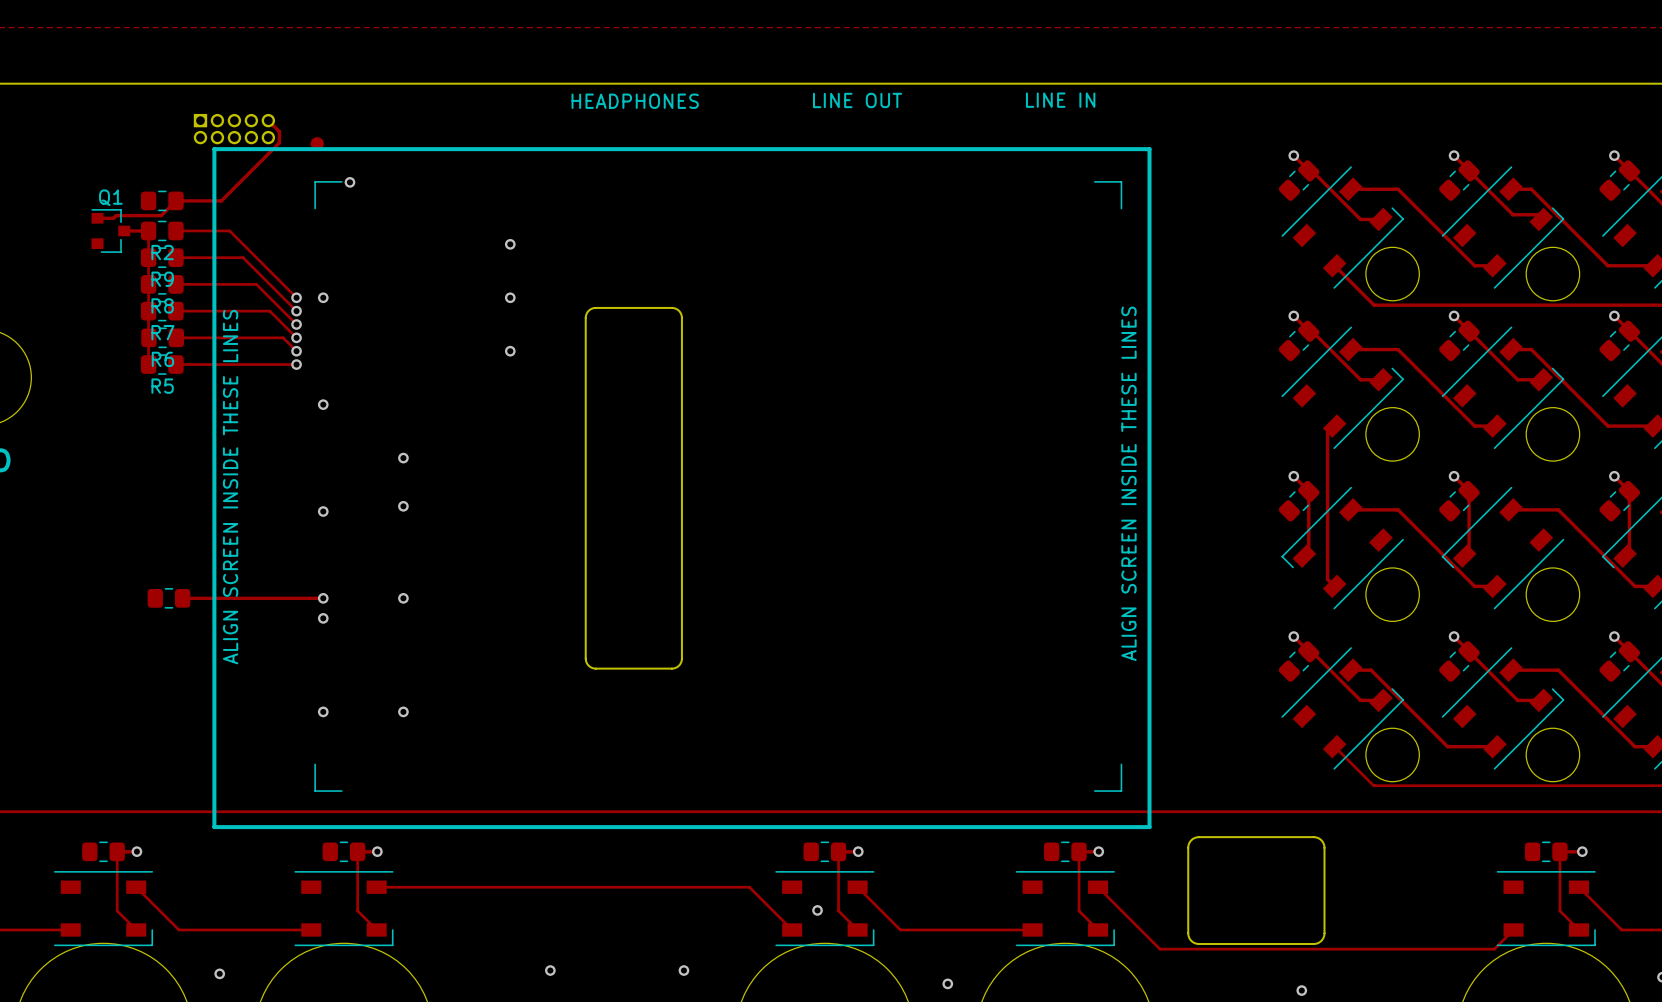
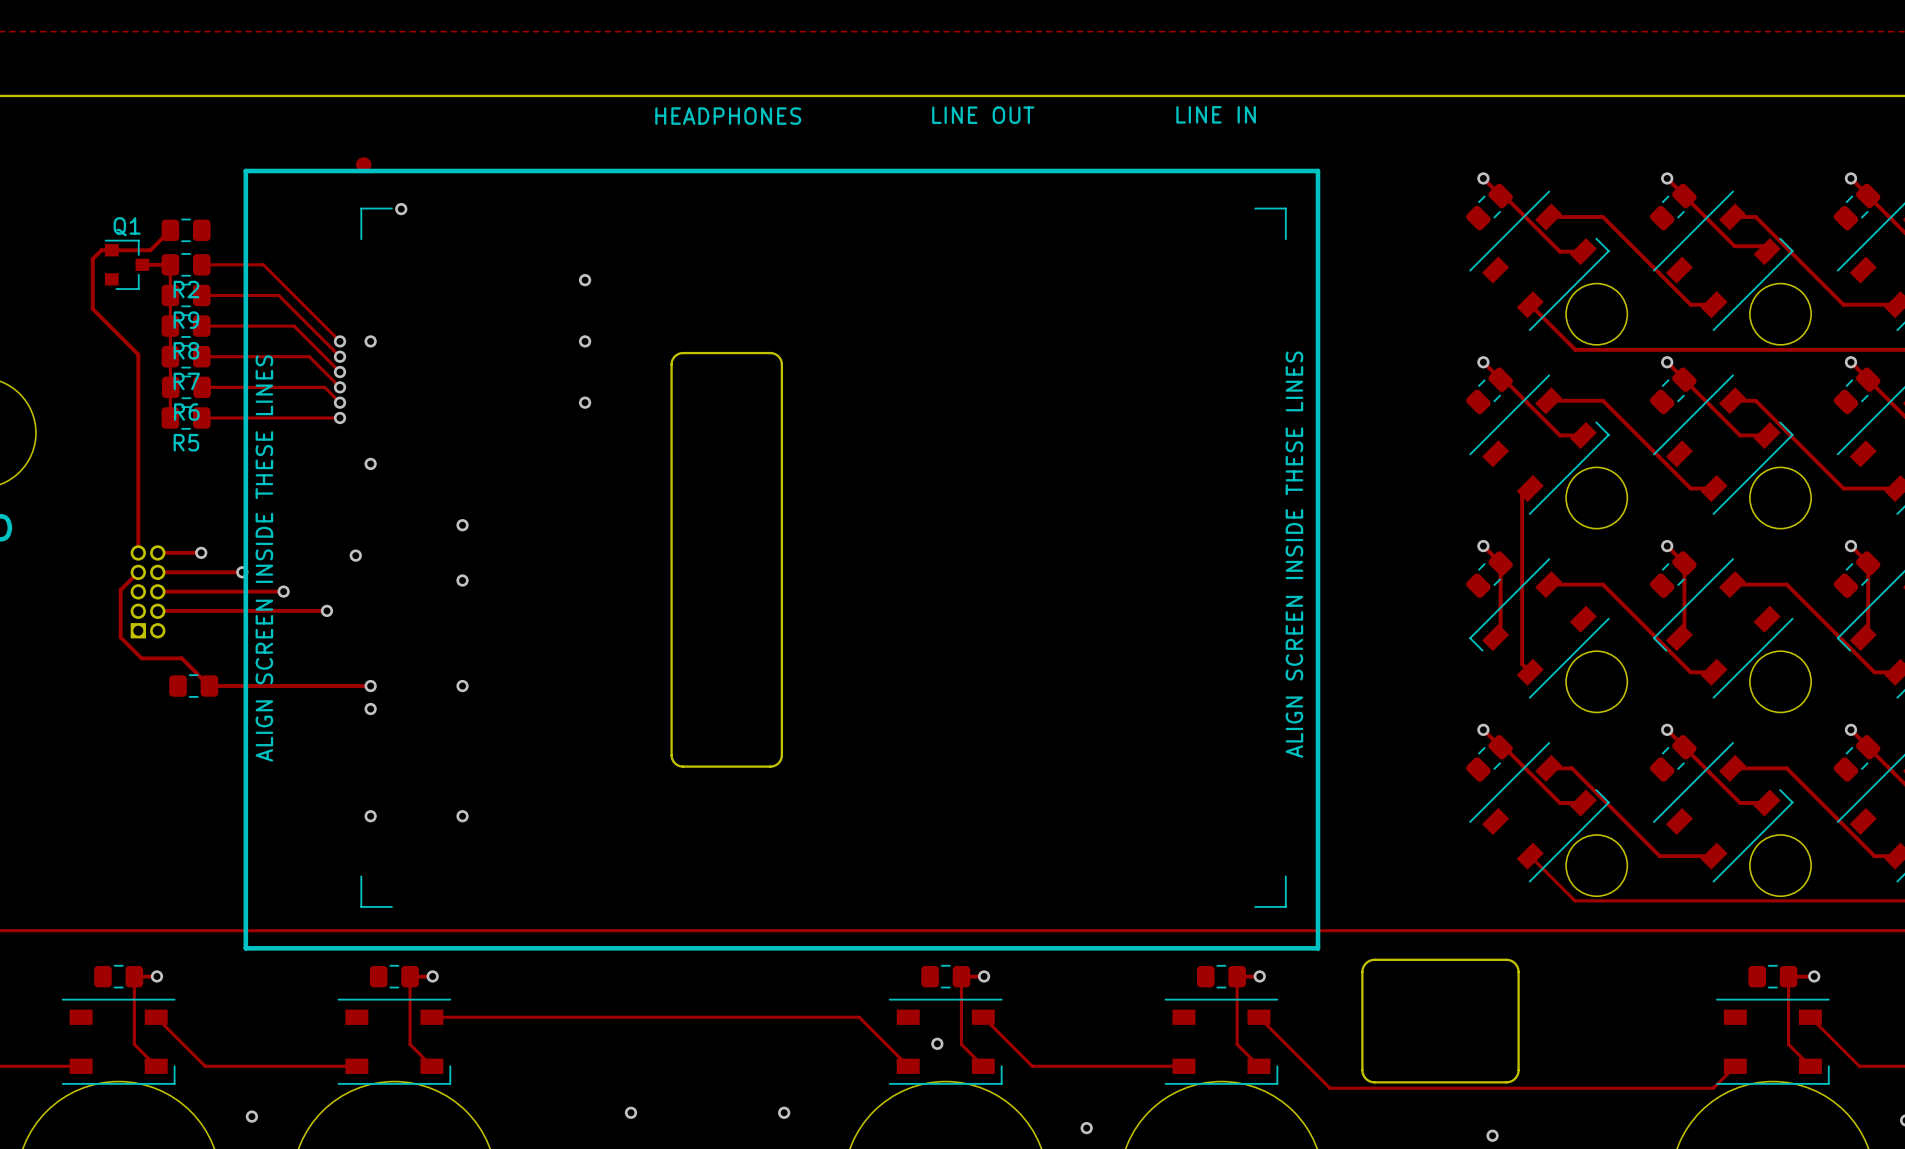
track: (268, 120) (279, 131) (279, 142) (221, 200) (175, 200) (161, 215) (116, 215) (113, 218) -> (170, 230) (150, 250) (130, 250)
part: (234, 129) -> none
track: none -> (111, 250) (101, 250) (92, 258) (92, 309) (138, 354) (138, 552)
track: none -> (157, 552) (201, 552)
via: none -> (201, 552)
via: none -> (355, 555)
track: none -> (138, 572) (120, 590) (120, 637) (141, 658) (181, 658) (209, 686)
track: none -> (157, 572) (242, 572)
via: none -> (242, 572)
via: (323, 511) -> none
track: none -> (283, 591) (157, 591)
via: none -> (283, 591)
part: none -> (148, 591)
track: none -> (326, 610) (157, 611)
via: none -> (326, 610)

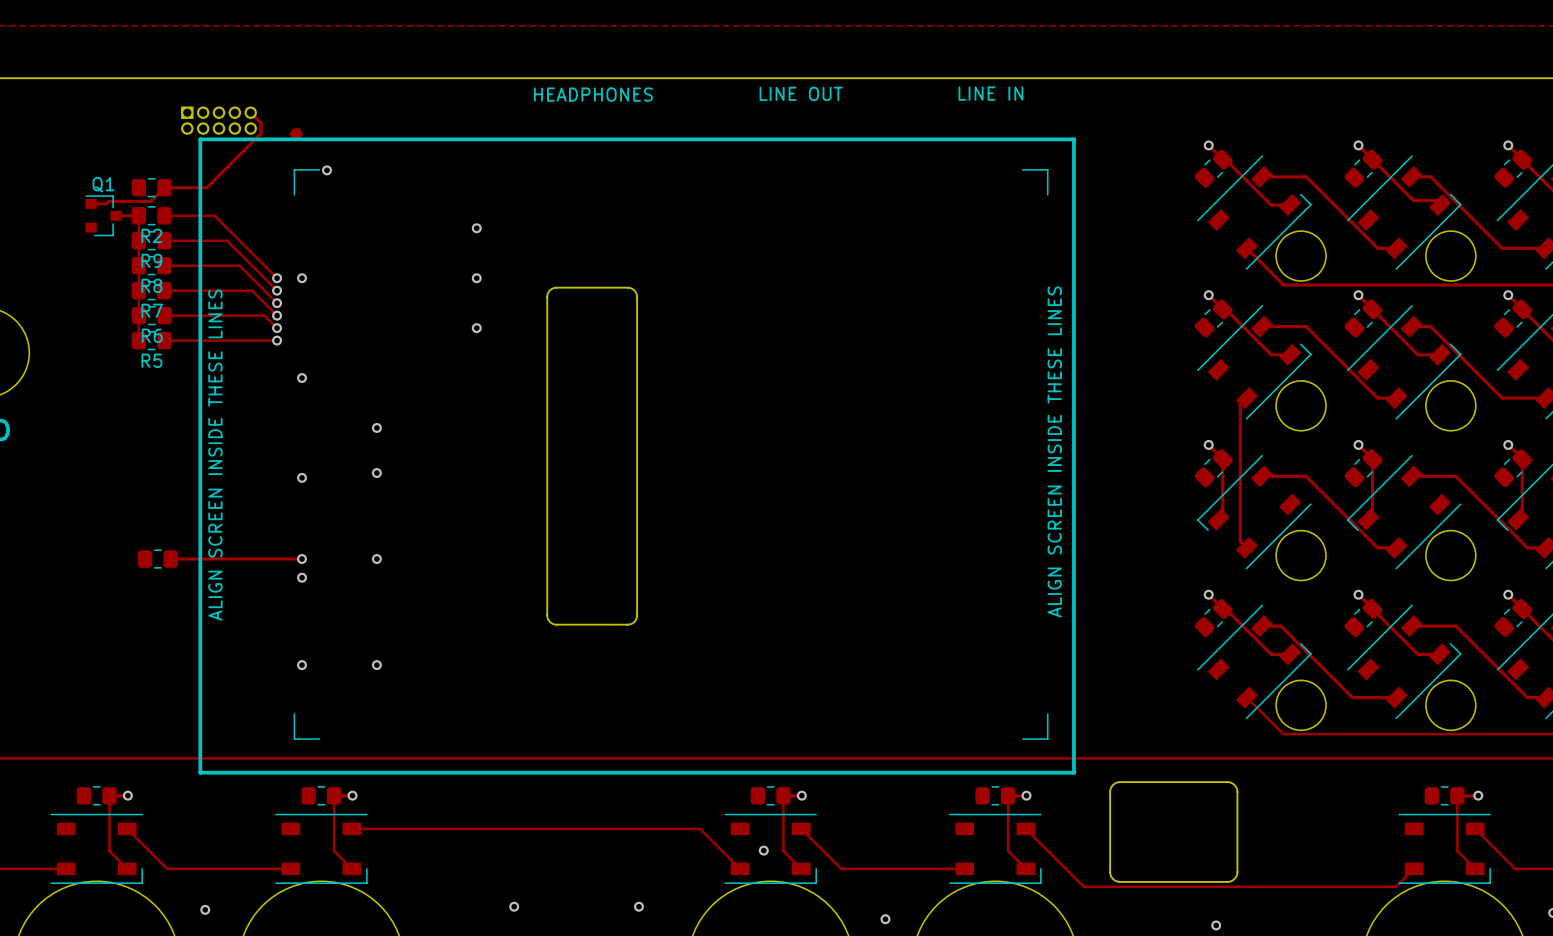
part: none -> (219, 120)
track: (170, 230) (150, 250) (130, 250) -> (250, 112) (261, 123) (261, 133) (206, 187) (164, 187) (150, 201) (108, 201) (106, 203)
track: (111, 250) (101, 250) (92, 258) (92, 309) (138, 354) (138, 552) -> none
track: (157, 552) (201, 552) -> none
via: (201, 552) -> none
via: (355, 555) -> none
track: (138, 572) (120, 590) (120, 637) (141, 658) (181, 658) (209, 686) -> none
track: (157, 572) (242, 572) -> none
via: (242, 572) -> none
via: none -> (302, 477)
part: (148, 591) -> none
track: (283, 591) (157, 591) -> none
via: (283, 591) -> none
track: (326, 610) (157, 611) -> none
via: (326, 610) -> none

